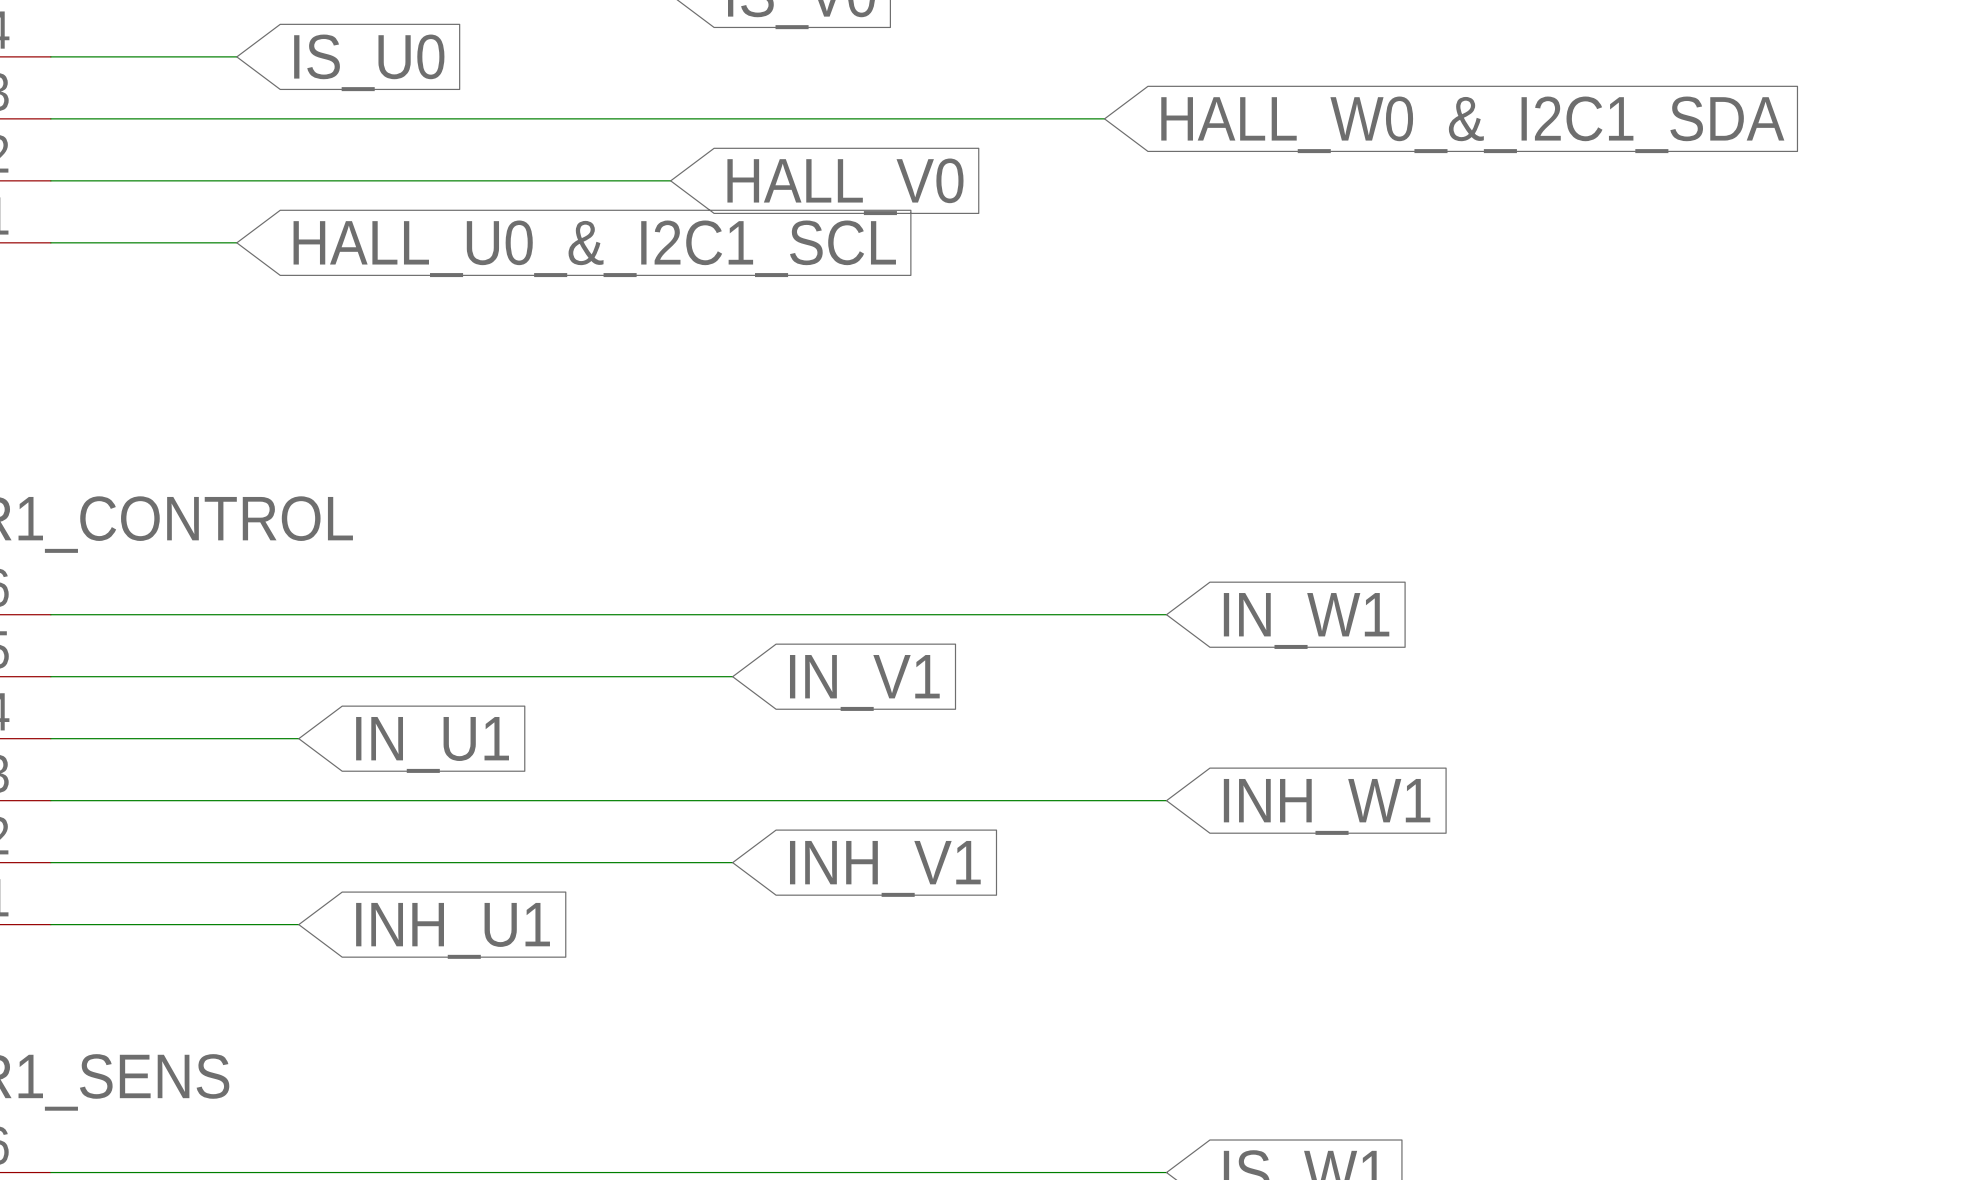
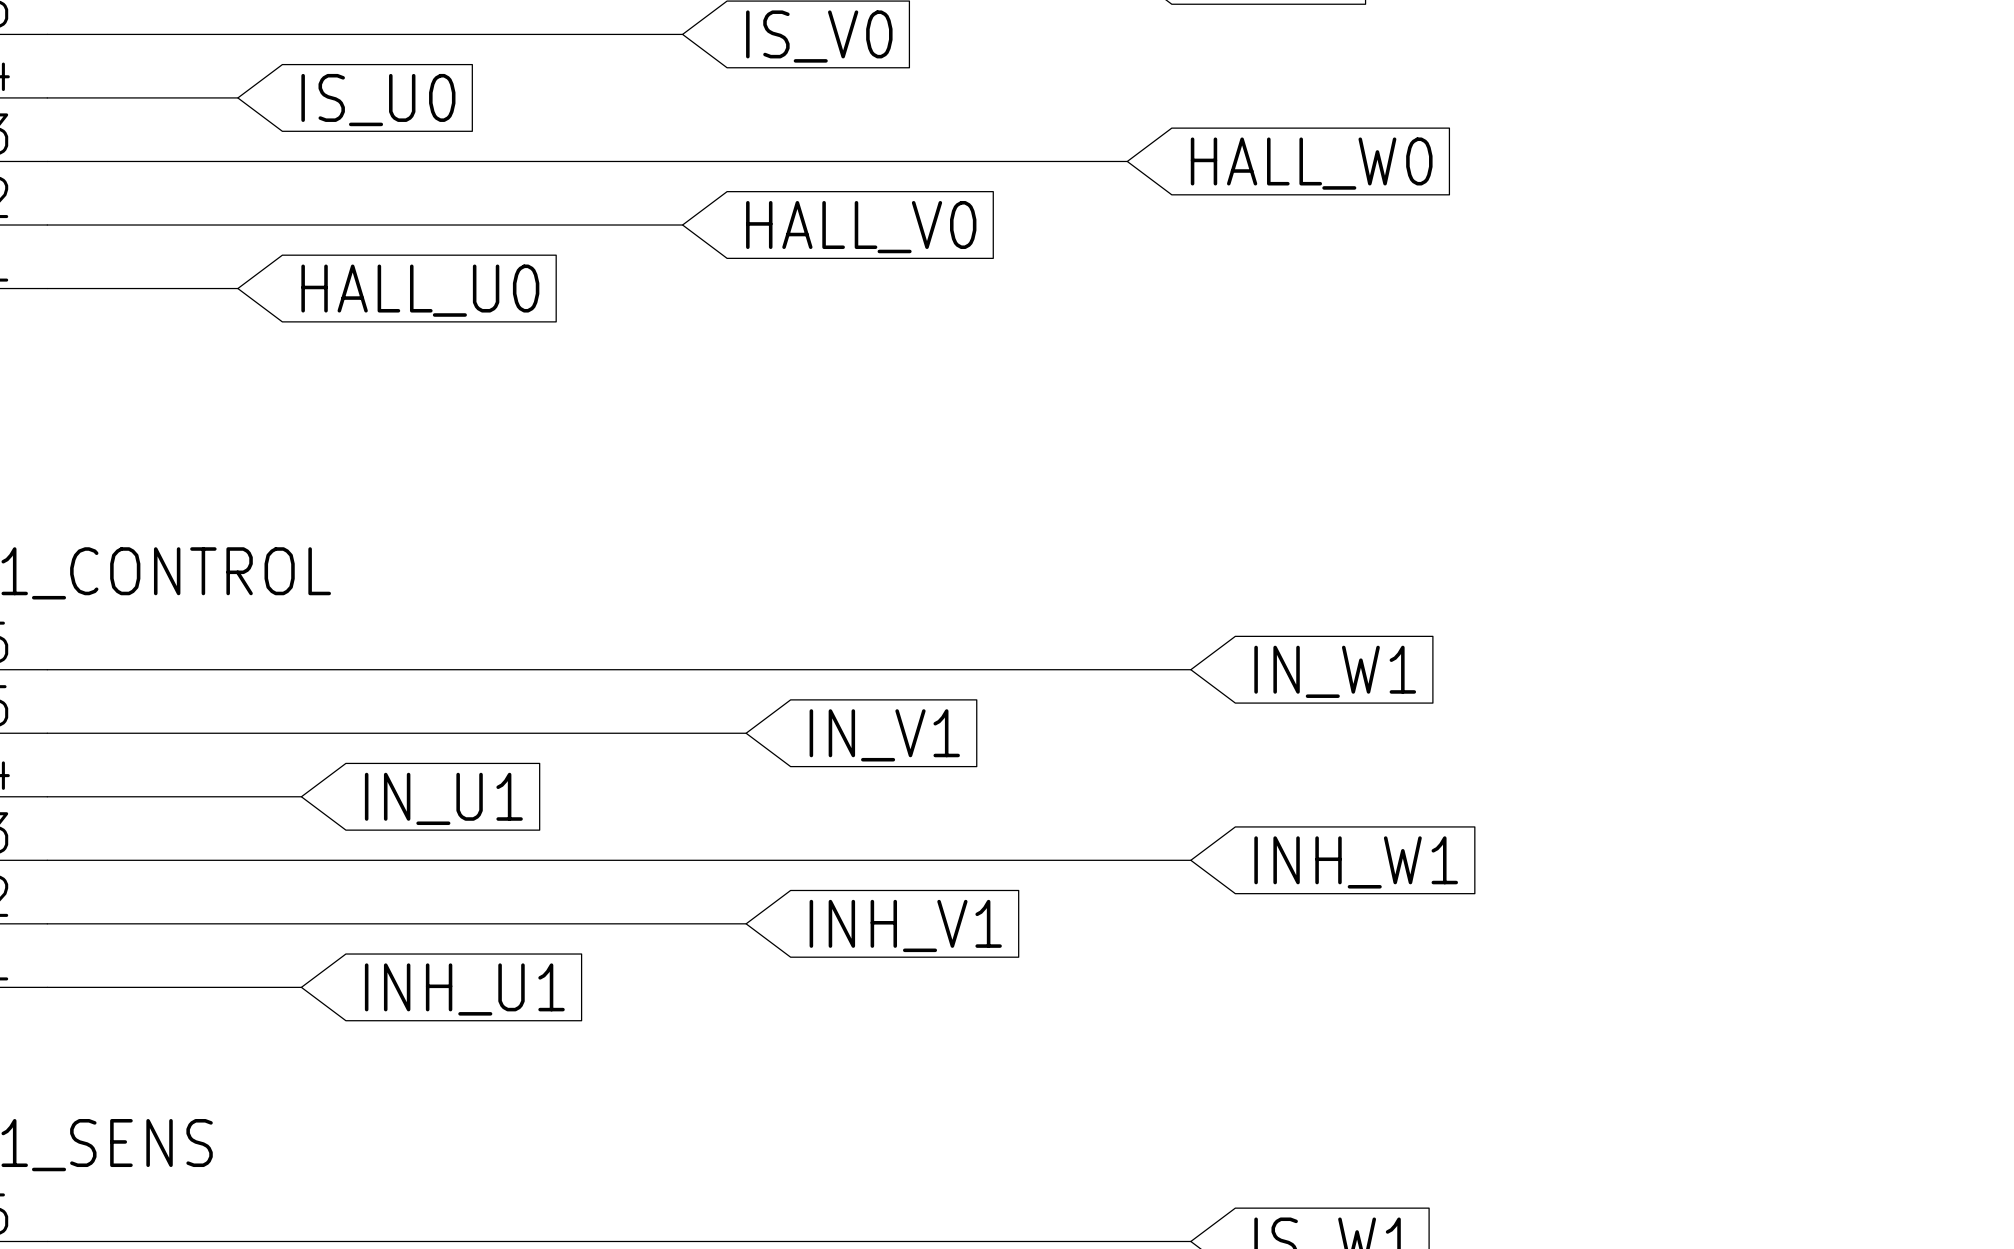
global label: HALL_W0_&_I2C1_SDA (1472, 124) -> HALL_W0 (1311, 163)
global label: HALL_U0_&_I2C1_SCL (594, 248) -> HALL_U0 (420, 290)

